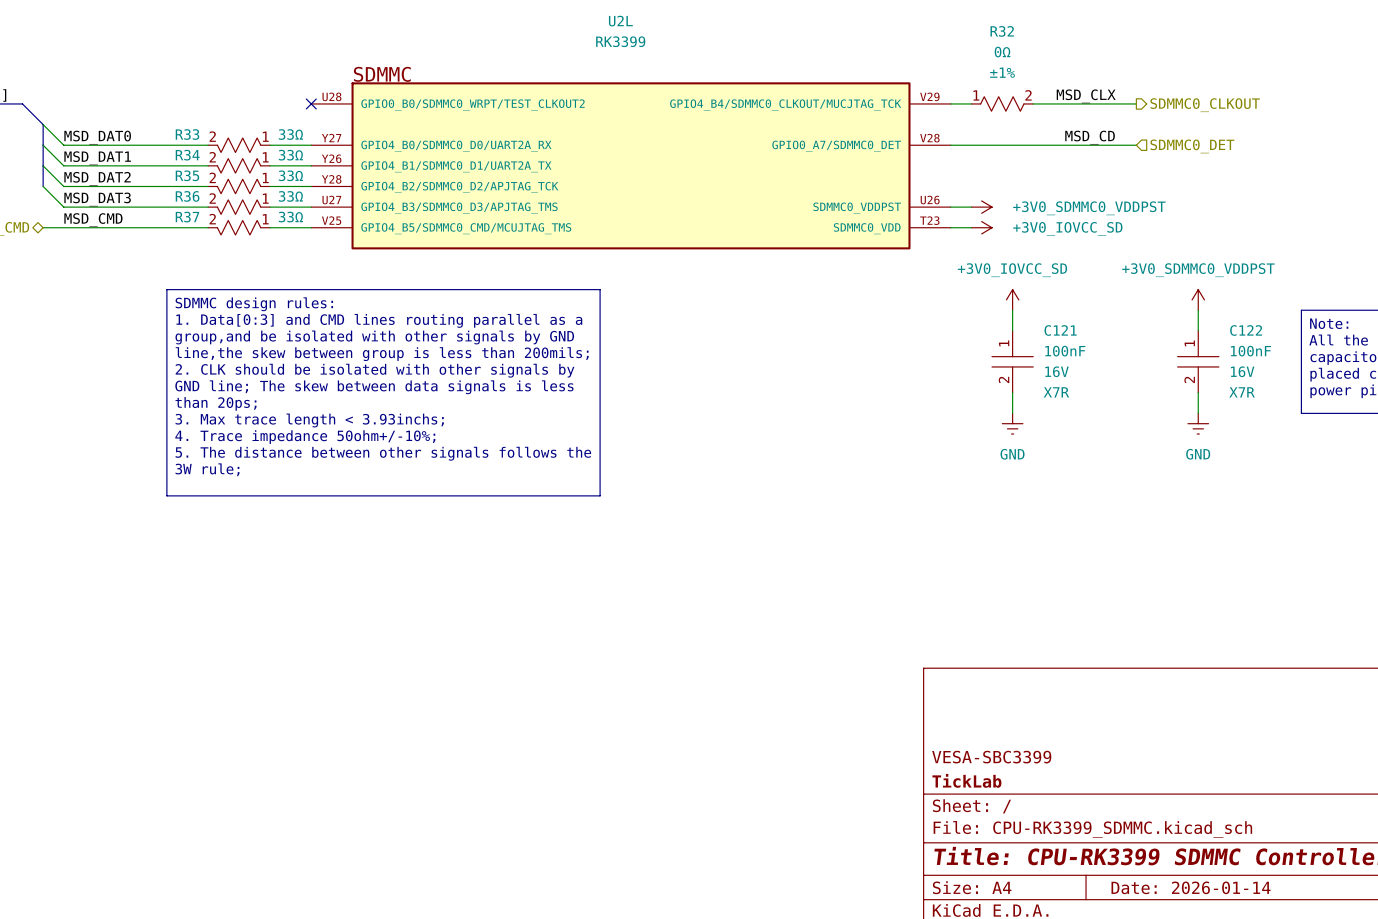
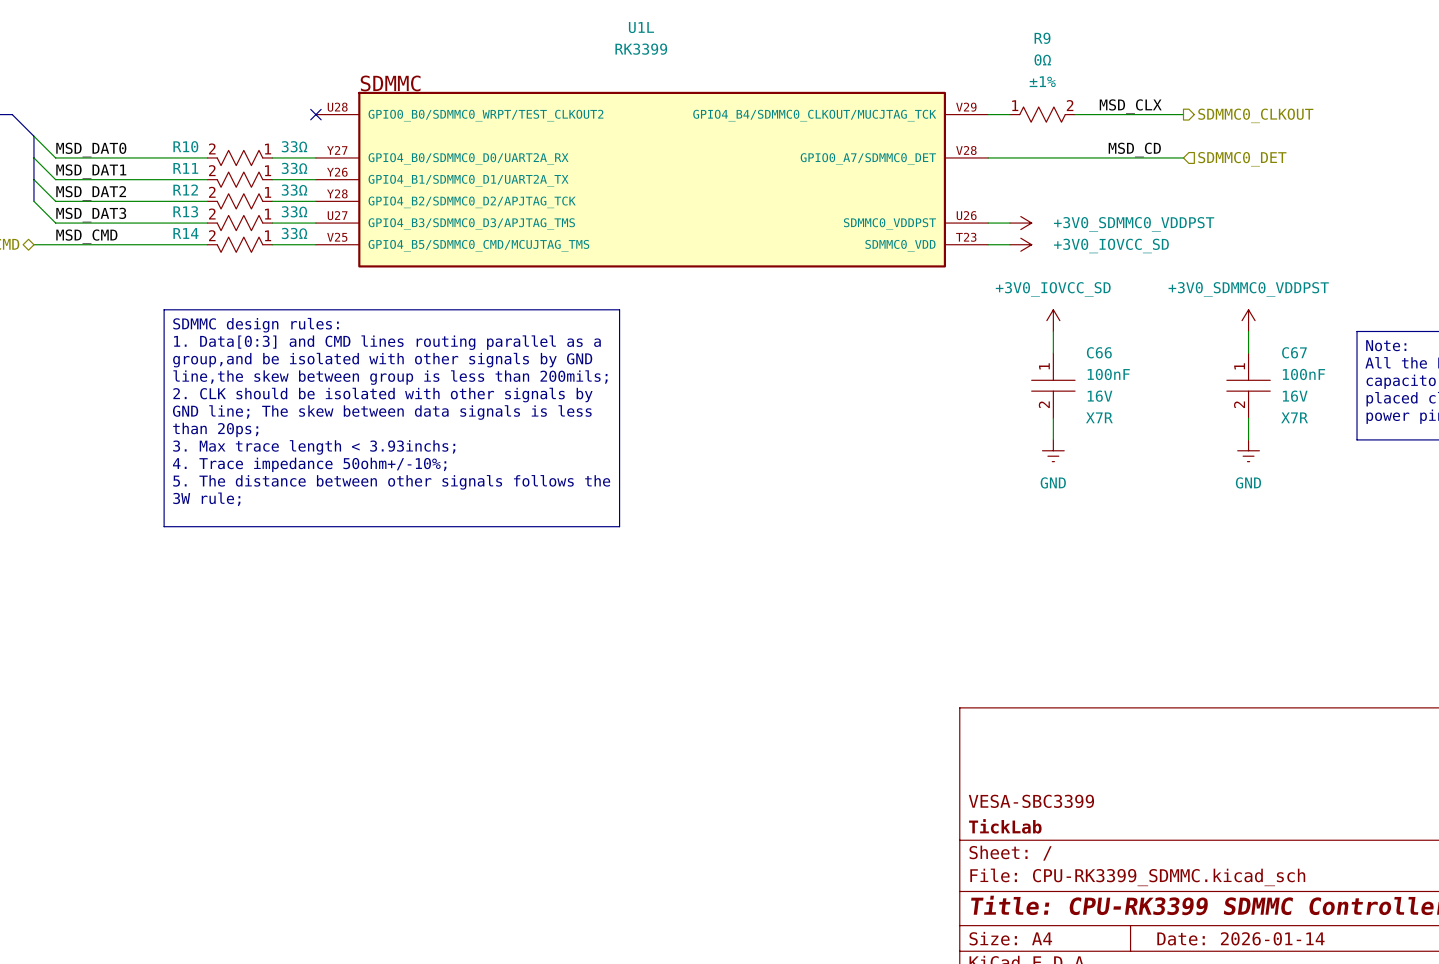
U2L name: U2L (620, 21) -> U1L (641, 27)
R32 name: R32 (1002, 31) -> R9 (1042, 38)
R33 name: R33 (187, 134) -> R10 (185, 146)
R34 name: R34 (187, 155) -> R11 (185, 168)
R35 name: R35 (187, 175) -> R12 (185, 190)
R36 name: R36 (187, 196) -> R13 (185, 211)
R37 name: R37 (187, 217) -> R14 (185, 233)
C121 name: C121 (1060, 330) -> C66 (1099, 352)
C122 name: C122 (1246, 330) -> C67 (1294, 352)

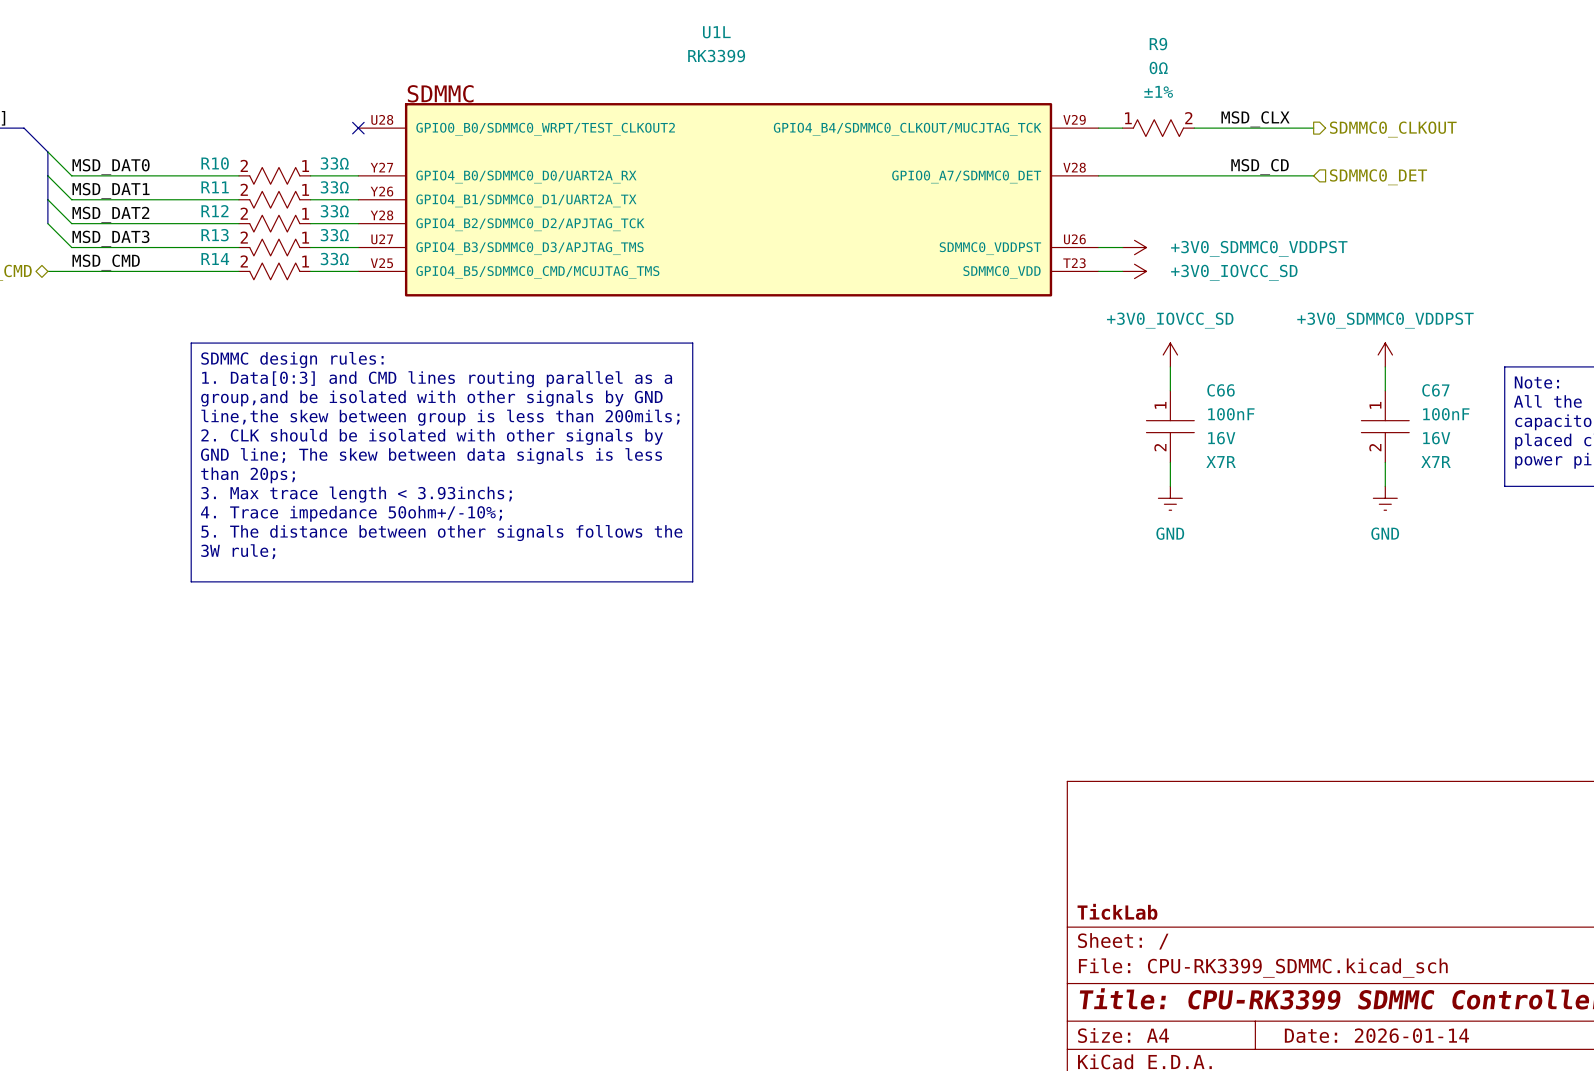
title block: VESA-SBC3399 (1031, 801) -> none

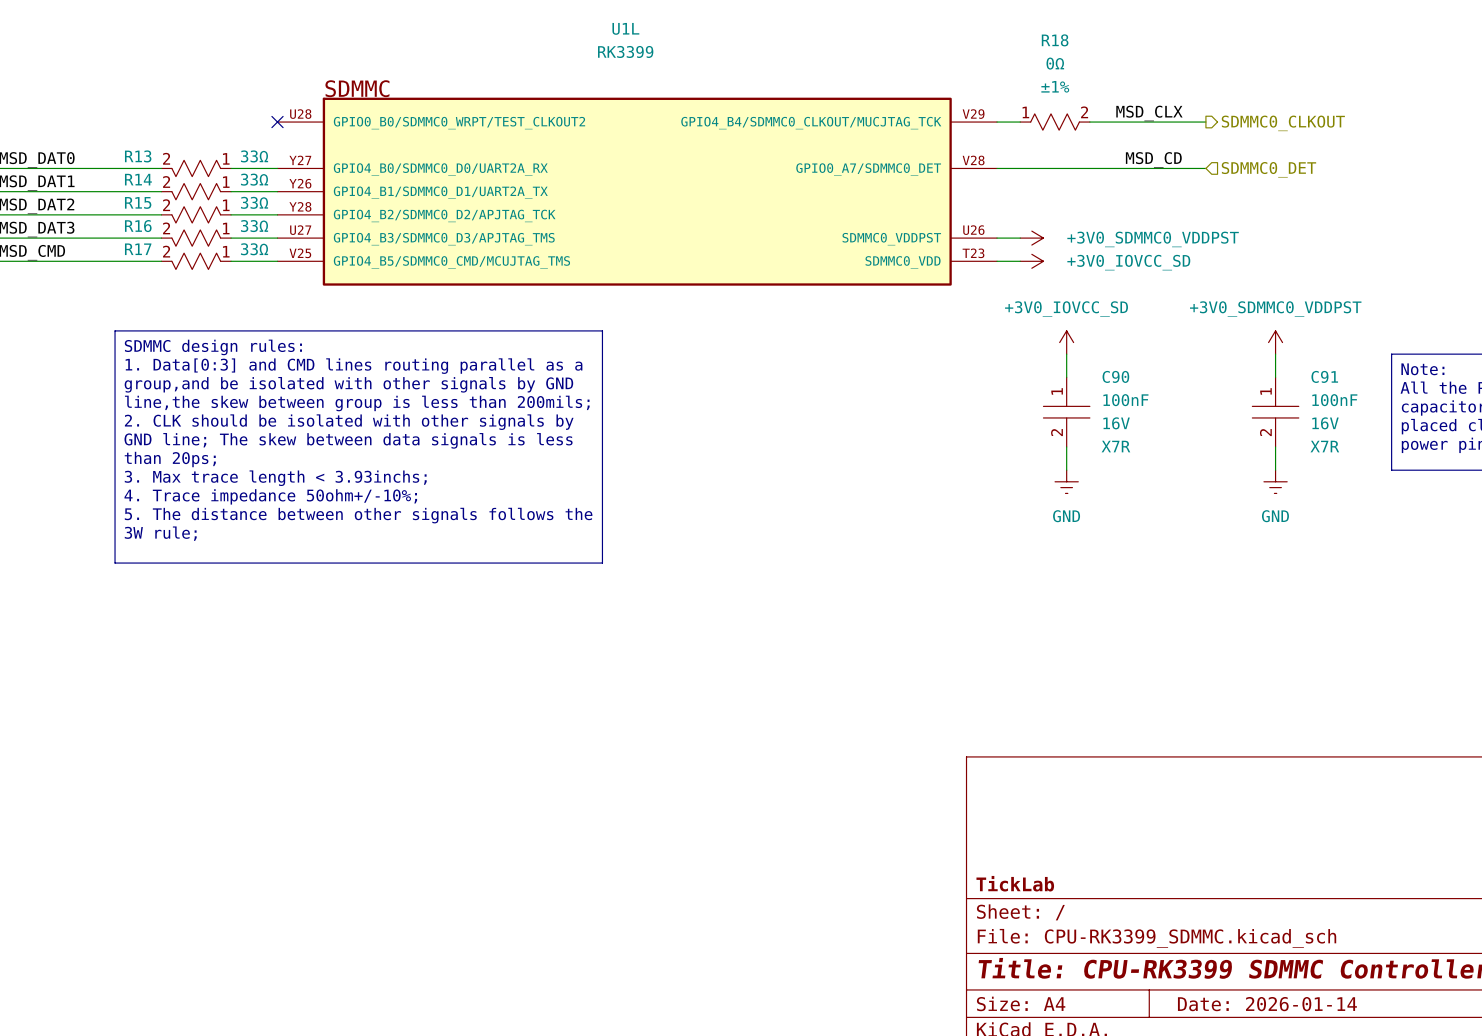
R9 name: R9 (1158, 44) -> R18 (1055, 40)
R10 name: R10 (215, 163) -> R13 (138, 156)
R11 name: R11 (215, 187) -> R14 (138, 179)
R12 name: R12 (214, 211) -> R15 (138, 202)
R13 name: R13 (215, 235) -> R16 (138, 226)
R14 name: R14 (215, 259) -> R17 (138, 249)
C66 name: C66 (1221, 390) -> C90 (1115, 376)
C67 name: C67 (1435, 390) -> C91 (1324, 376)

